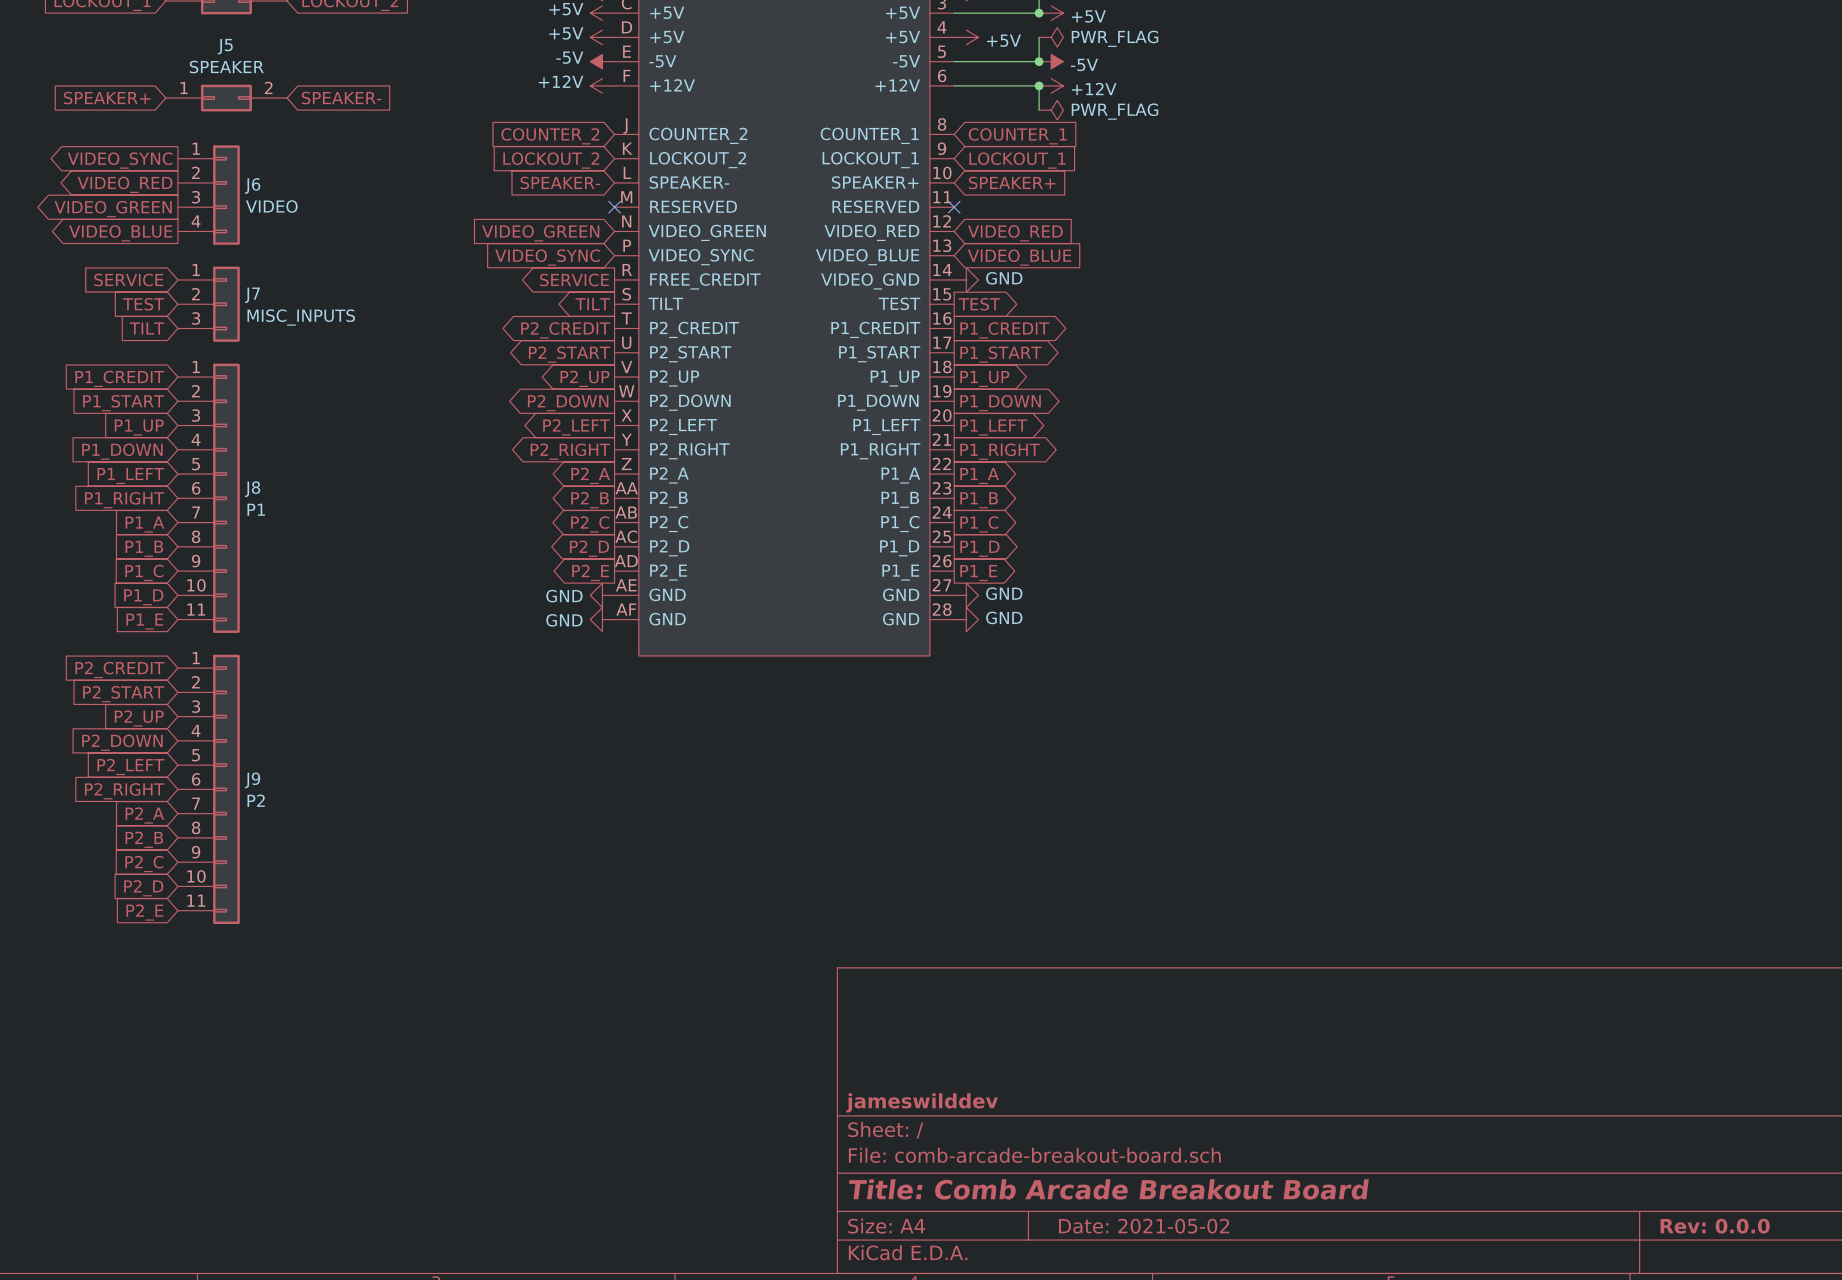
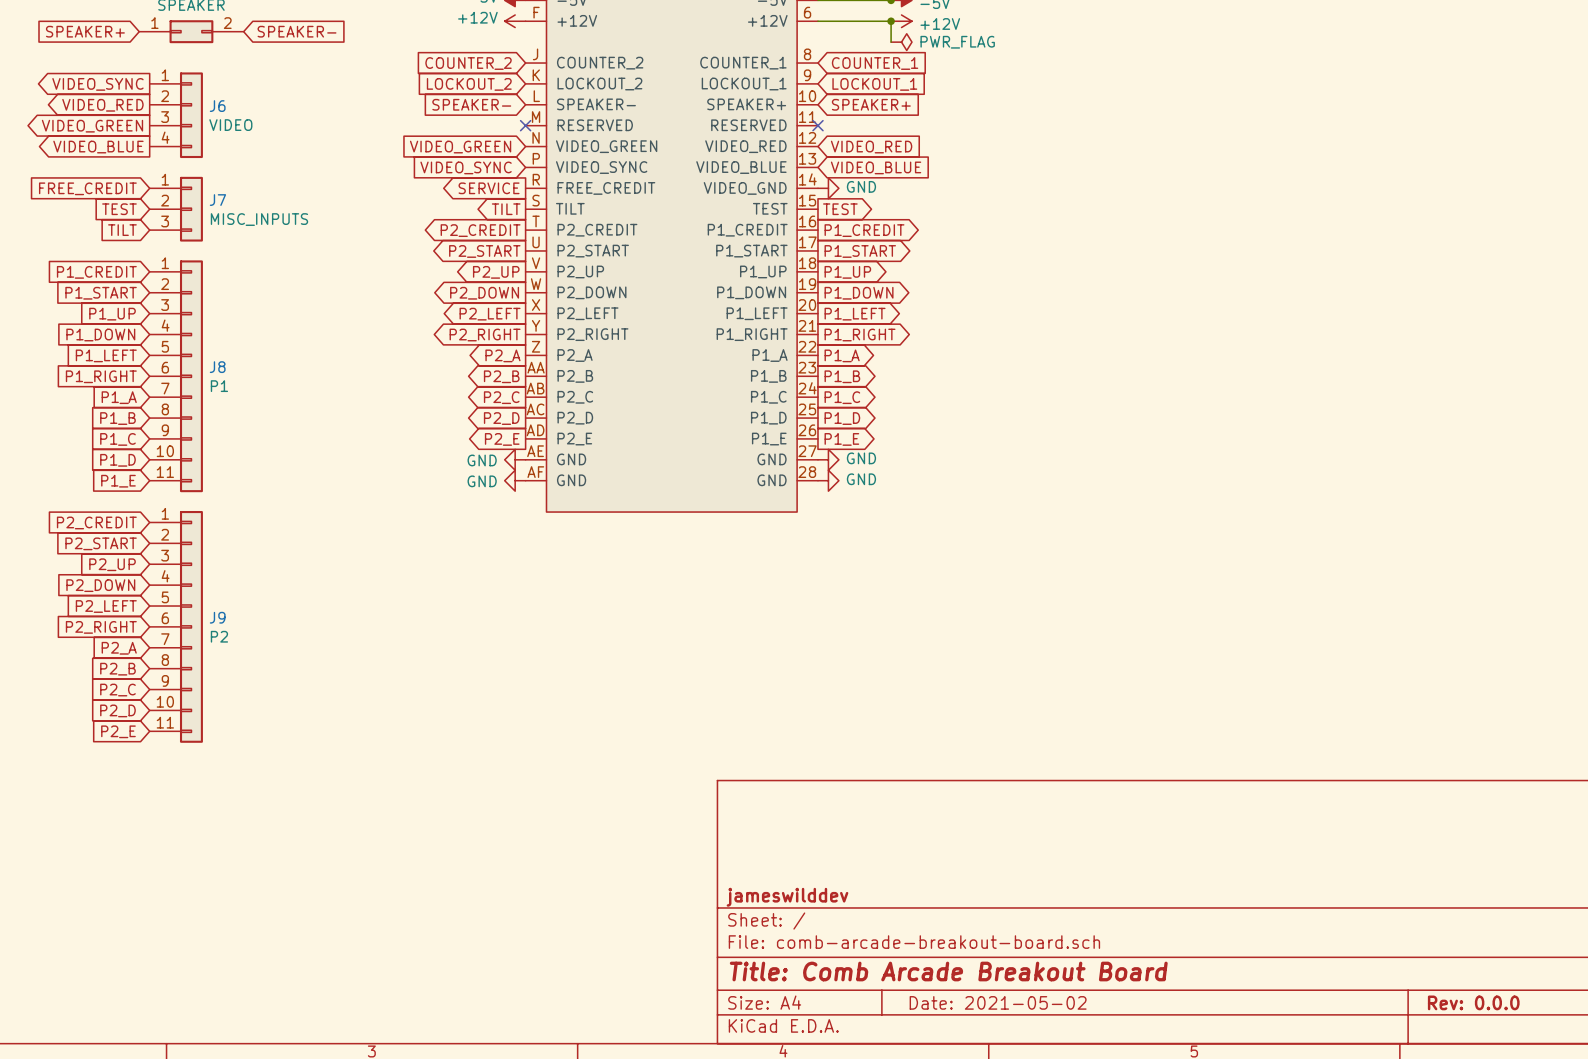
global label: SERVICE (128, 279) -> FREE_CREDIT (87, 188)

